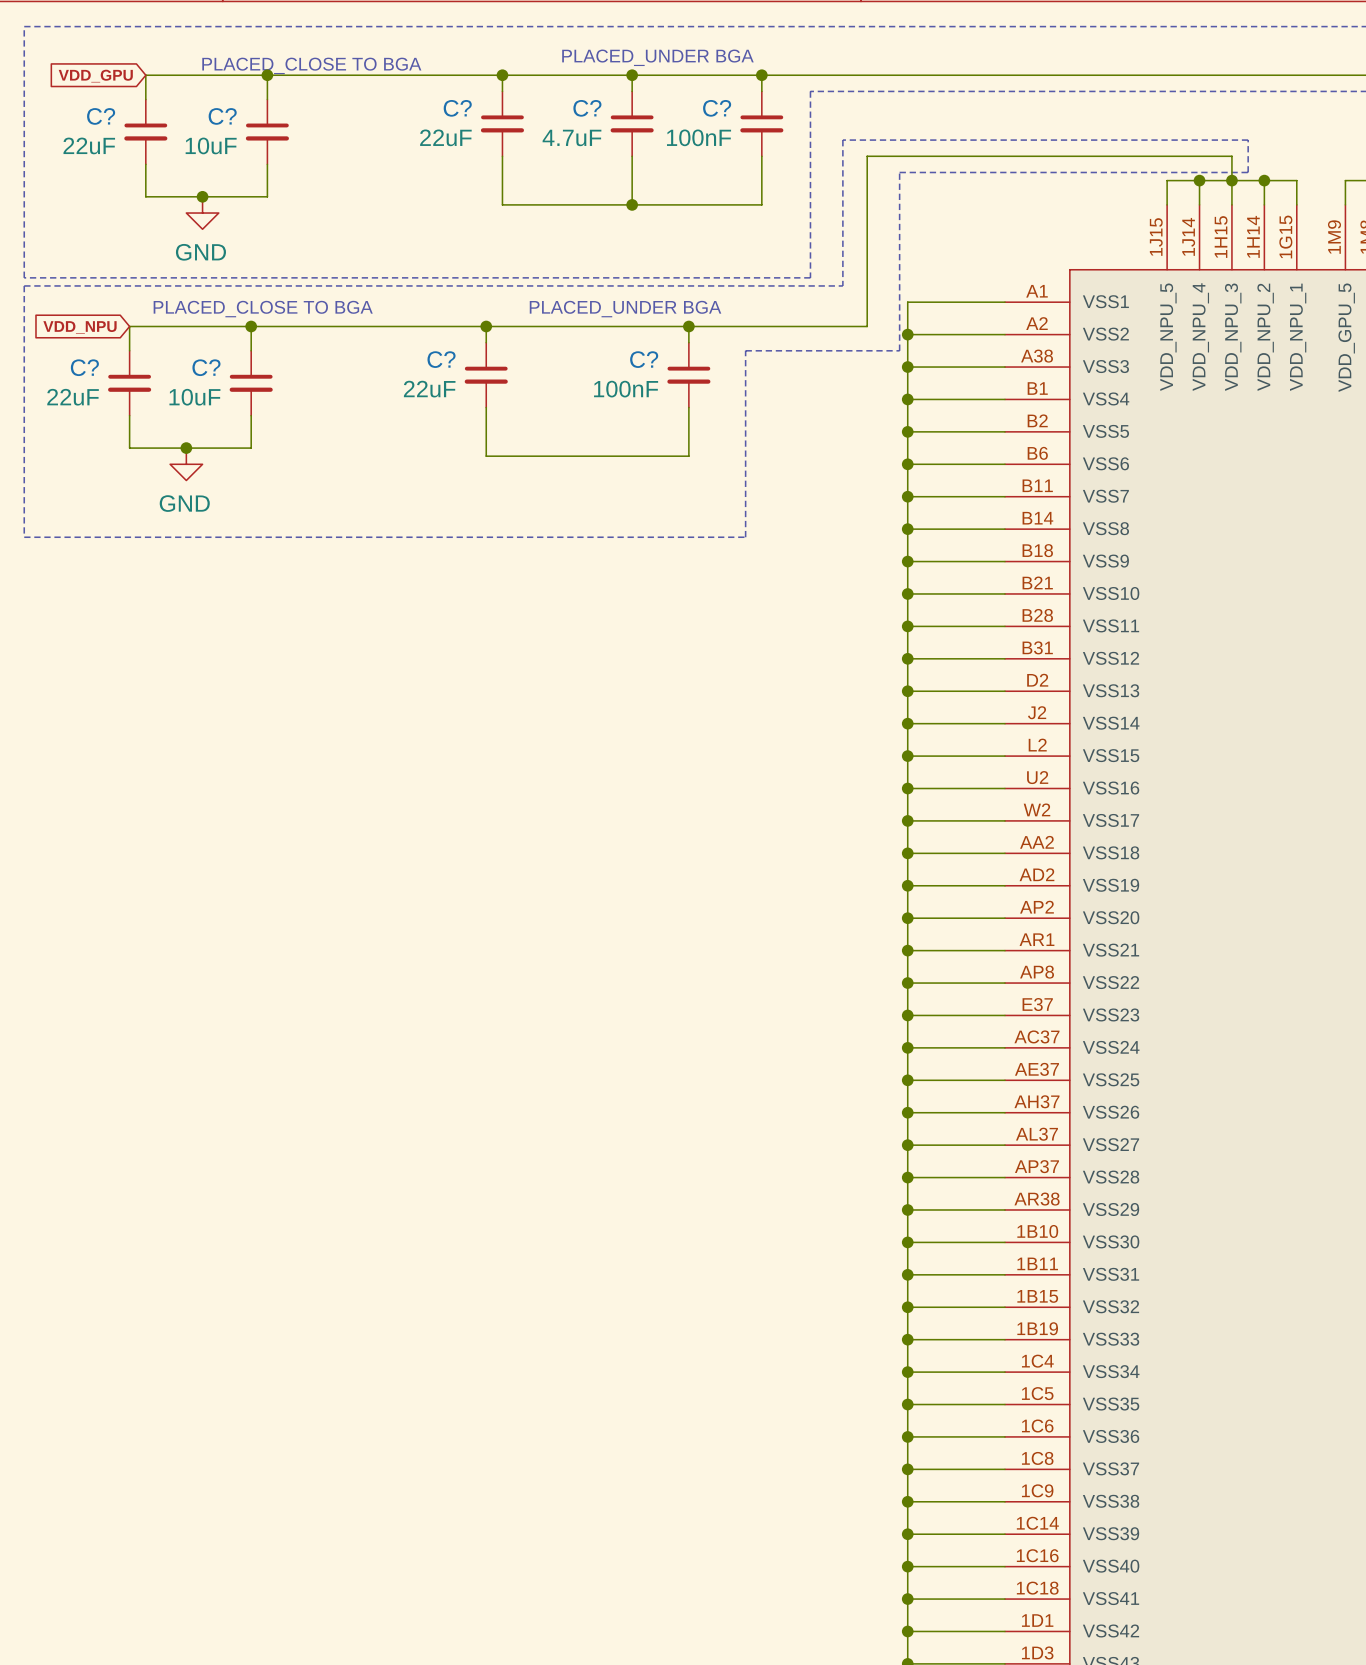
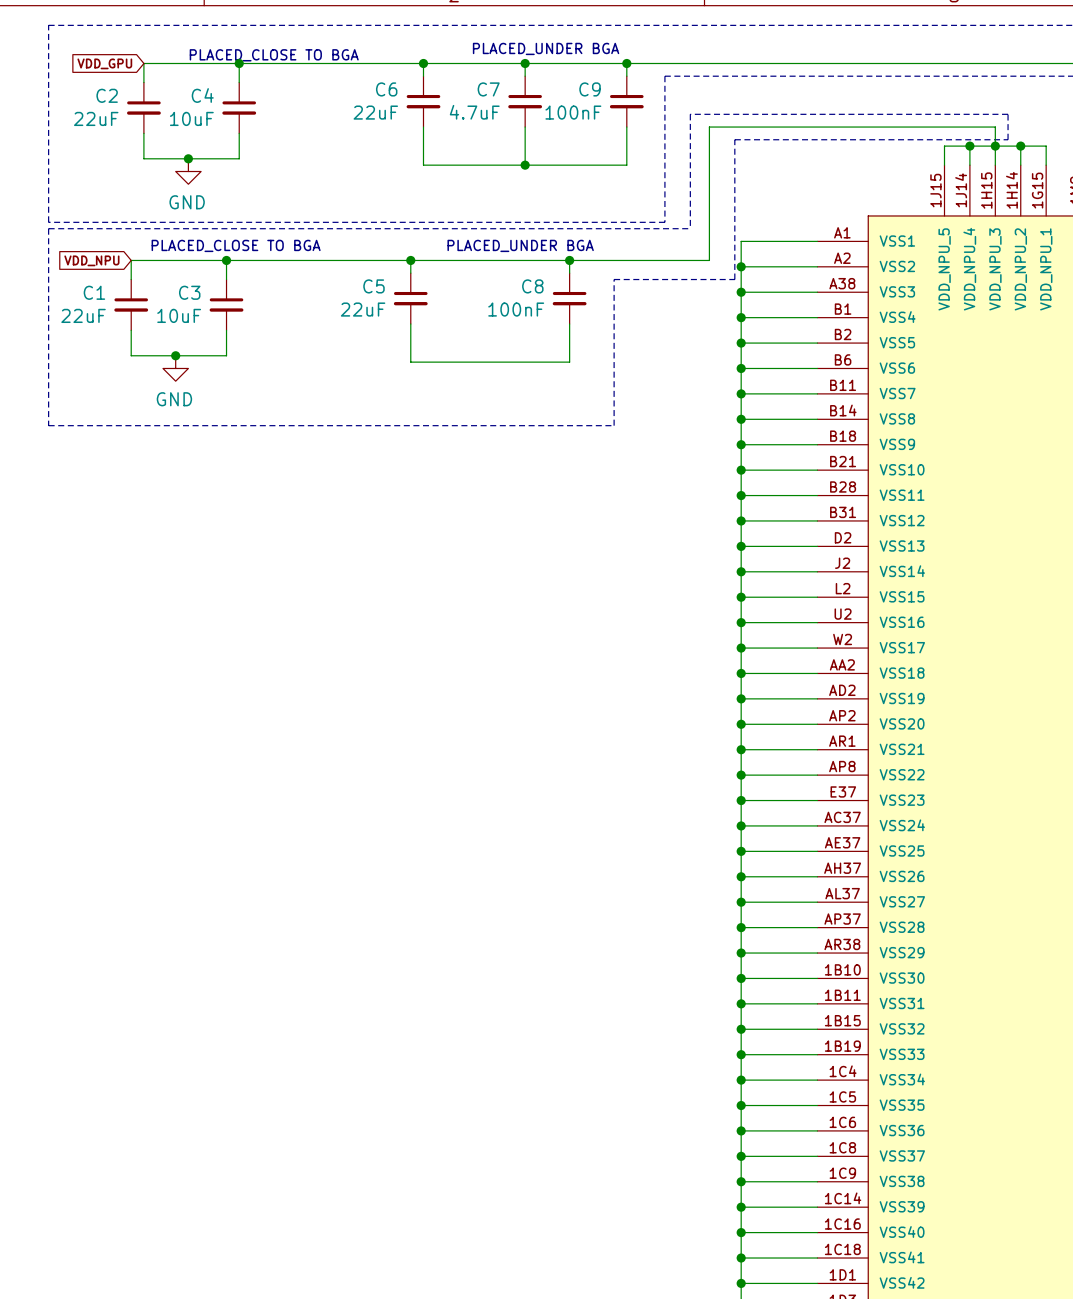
C? name: C? (457, 108) -> C6 (386, 89)
C? name: C? (587, 108) -> C7 (488, 89)
C? name: C? (717, 108) -> C9 (590, 89)
C? name: C? (101, 116) -> C2 (107, 95)
C? name: C? (222, 116) -> C4 (202, 95)
C? name: C? (441, 359) -> C5 (373, 286)
C? name: C? (644, 359) -> C8 (532, 286)
C? name: C? (84, 367) -> C1 (94, 292)
C? name: C? (206, 367) -> C3 (189, 292)

